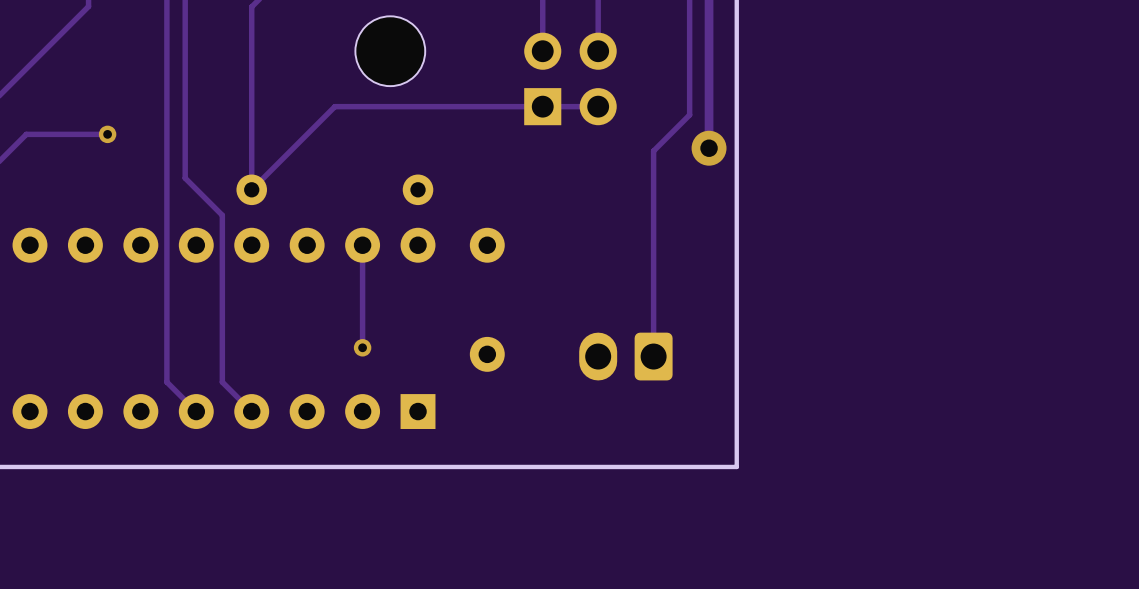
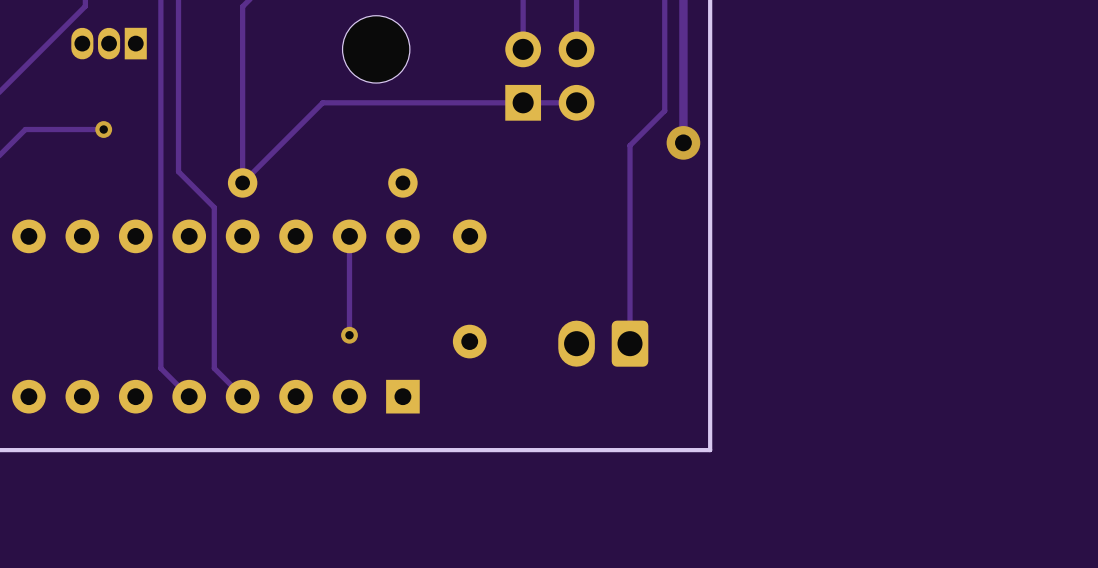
part: none -> (109, 43)

